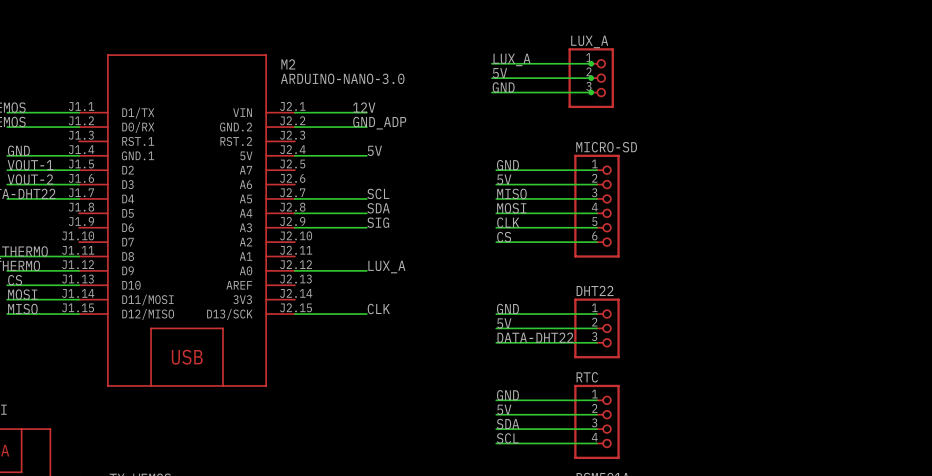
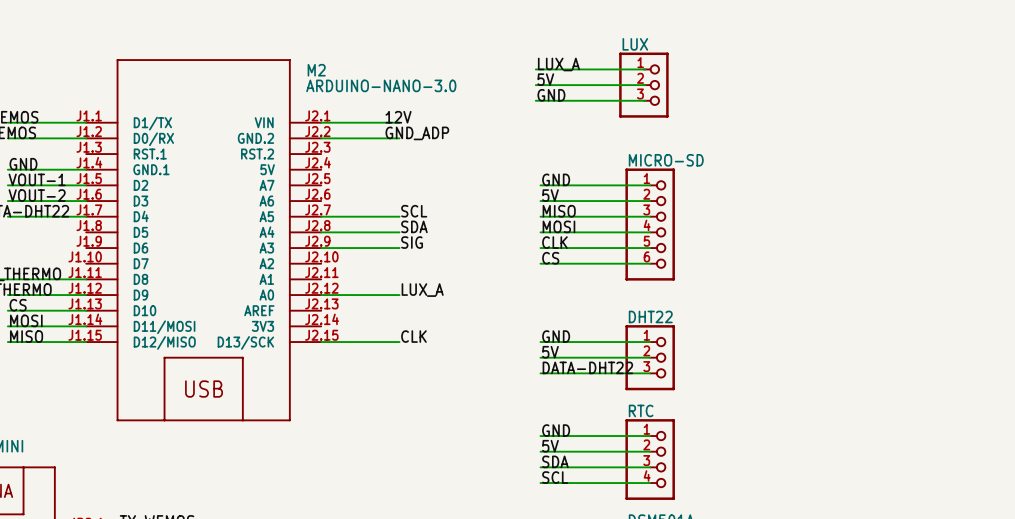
LUX_A name: LUX_A (589, 41) -> LUX (635, 44)
junction: (591, 63) -> none
junction: (591, 78) -> none
junction: (591, 92) -> none
label: 5V (374, 150) -> none
wire: (294, 155) (366, 155) -> none

